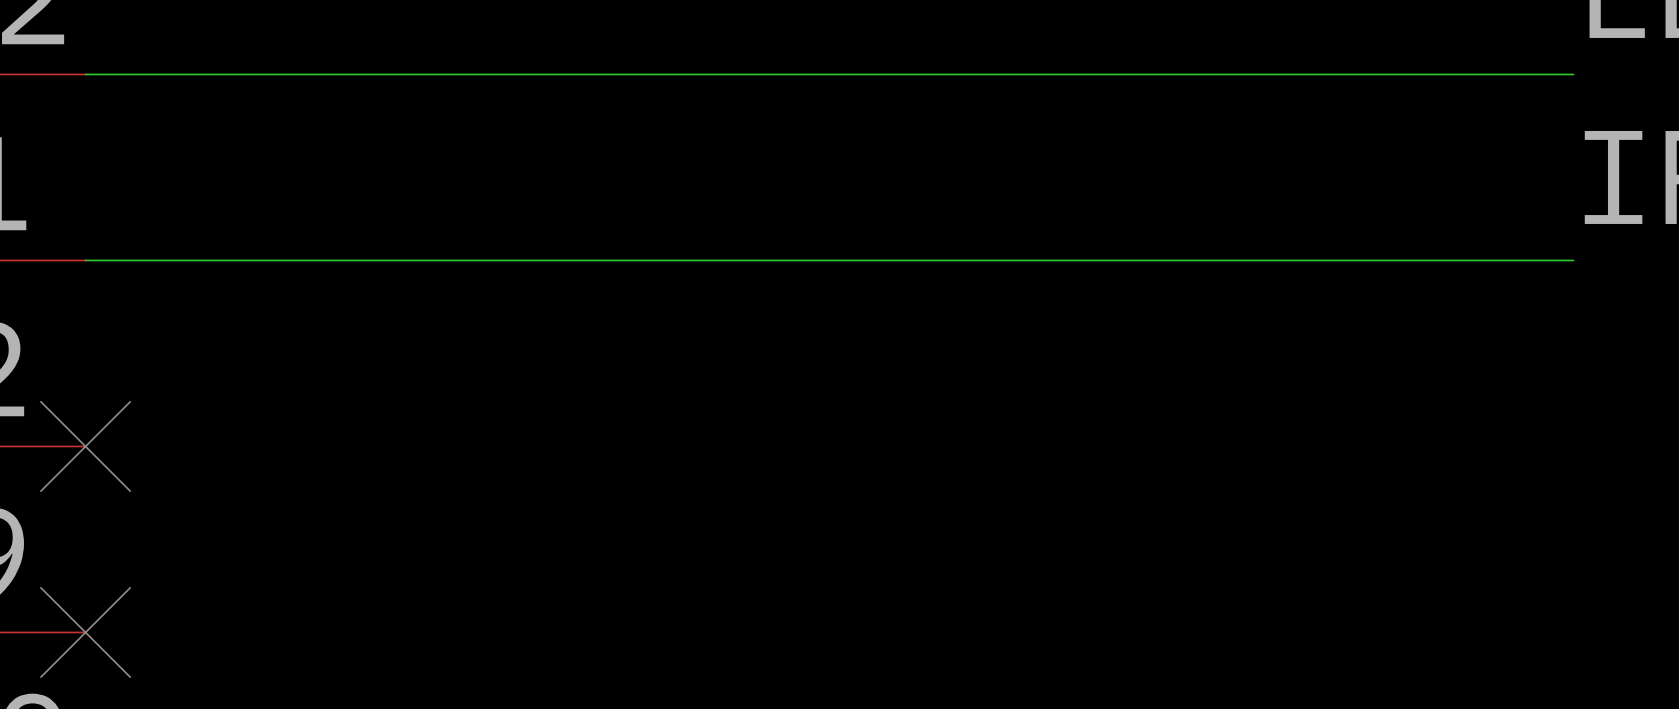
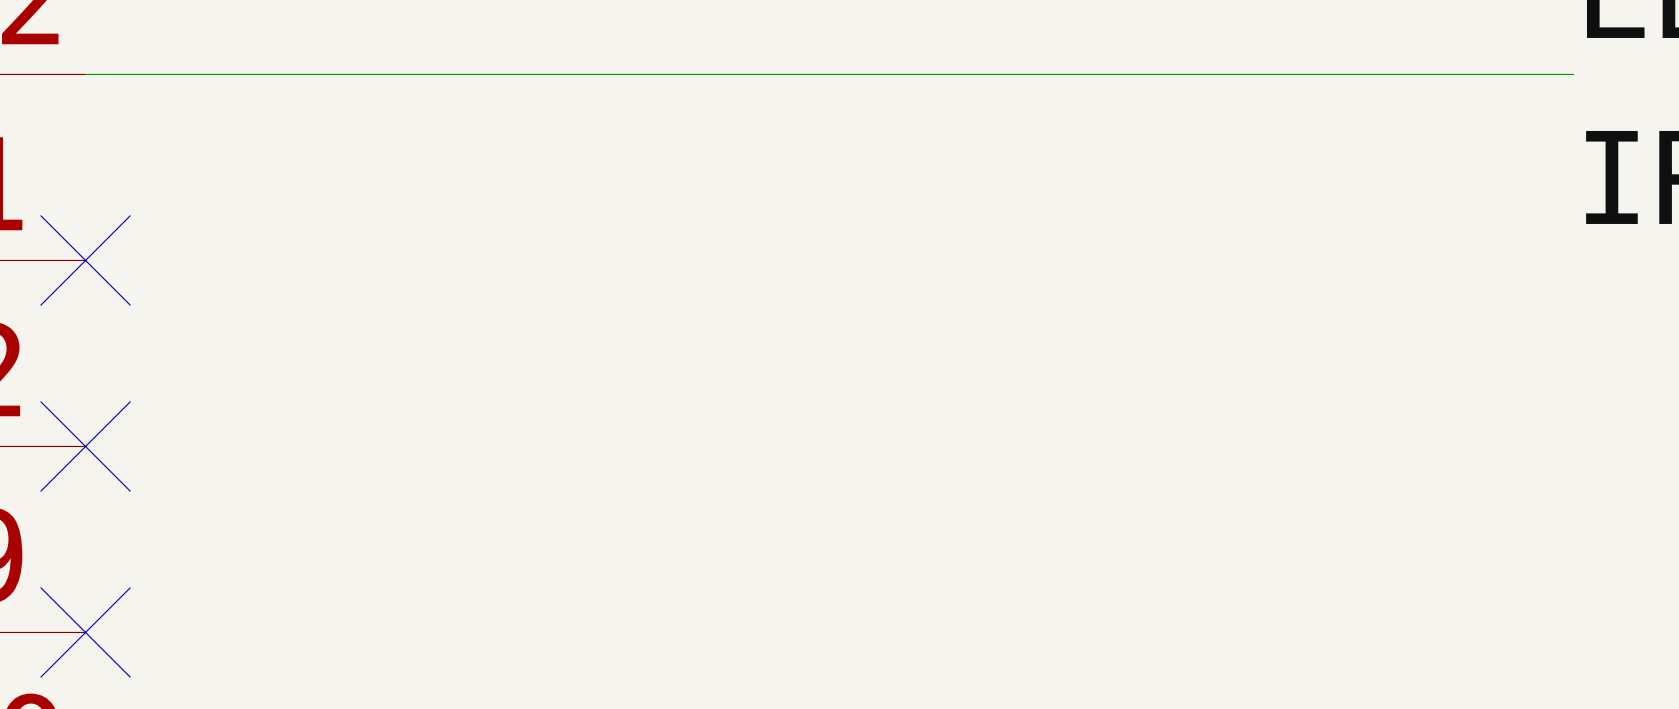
wire: (85, 260) (1573, 260) -> none
no-connect mark: none -> (85, 260)

